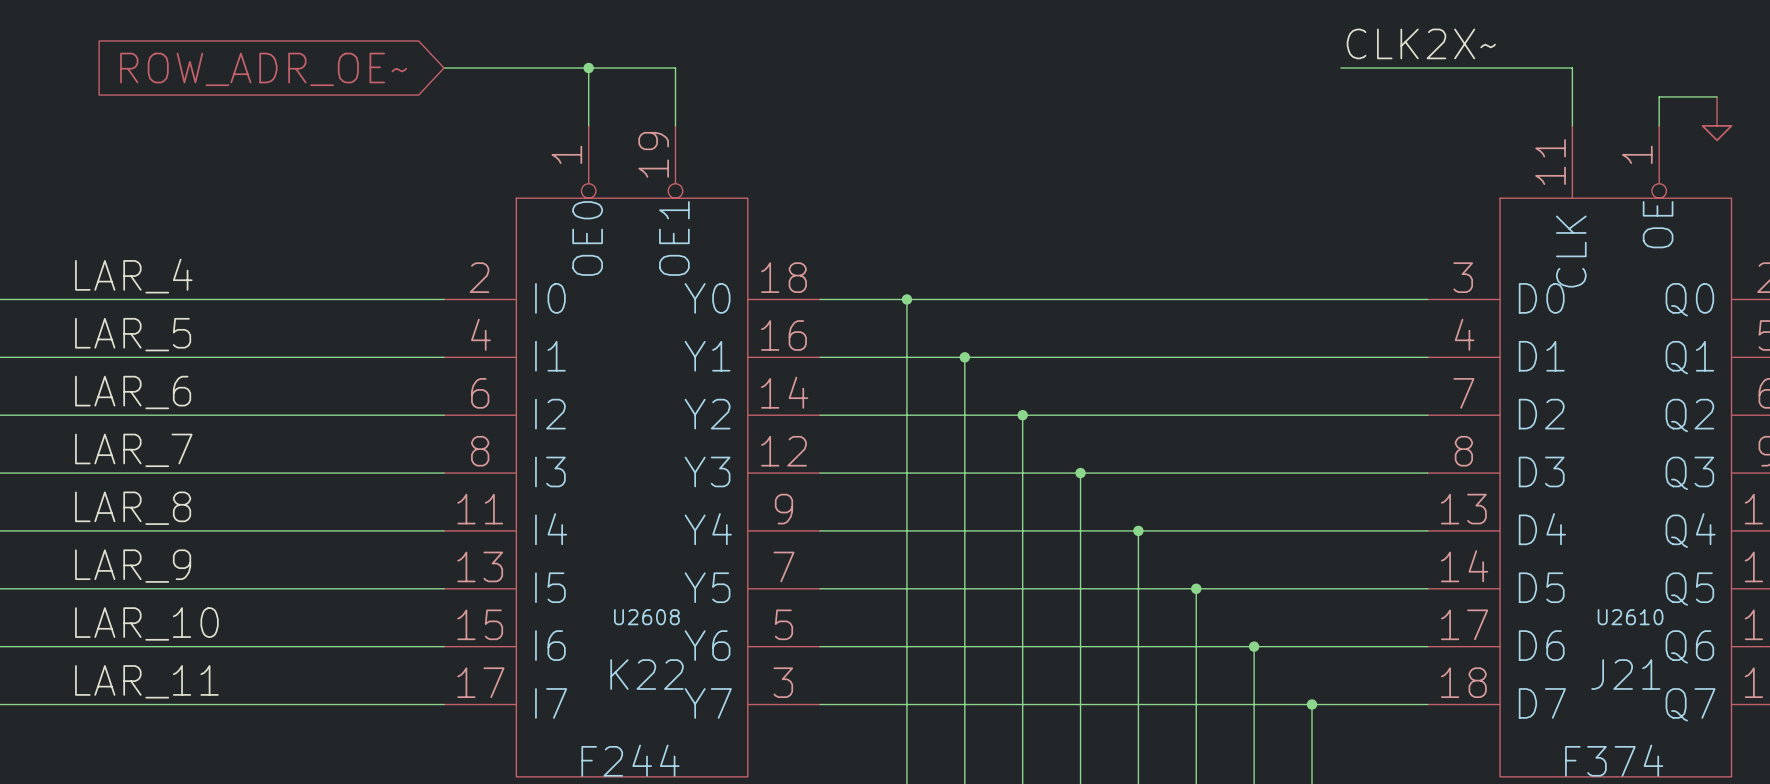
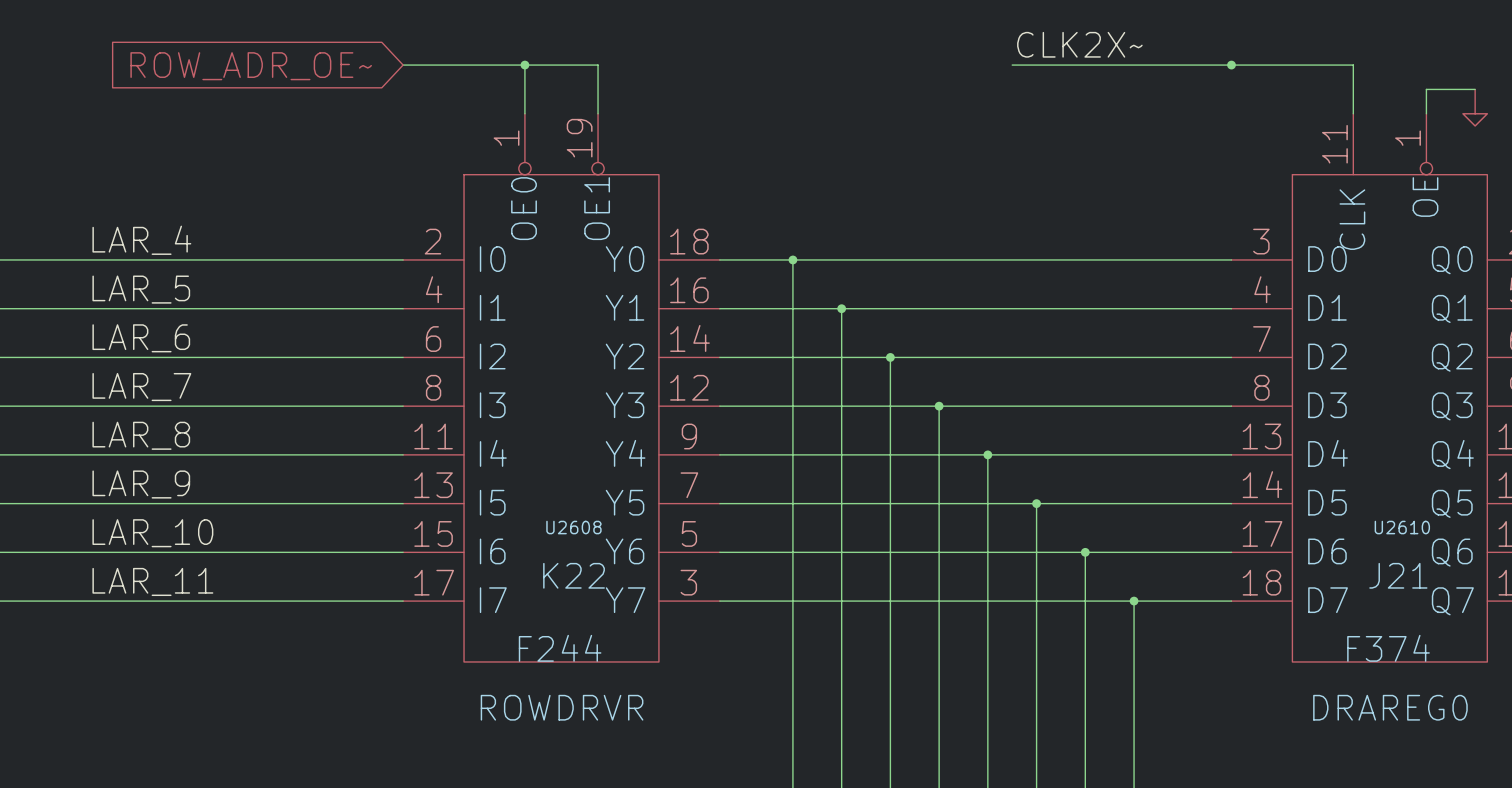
label position: CLK2X~ (1421, 43) -> CLK2X~ (1079, 44)
wire: none -> (1012, 65) (1158, 65)
junction: none -> (1231, 65)

